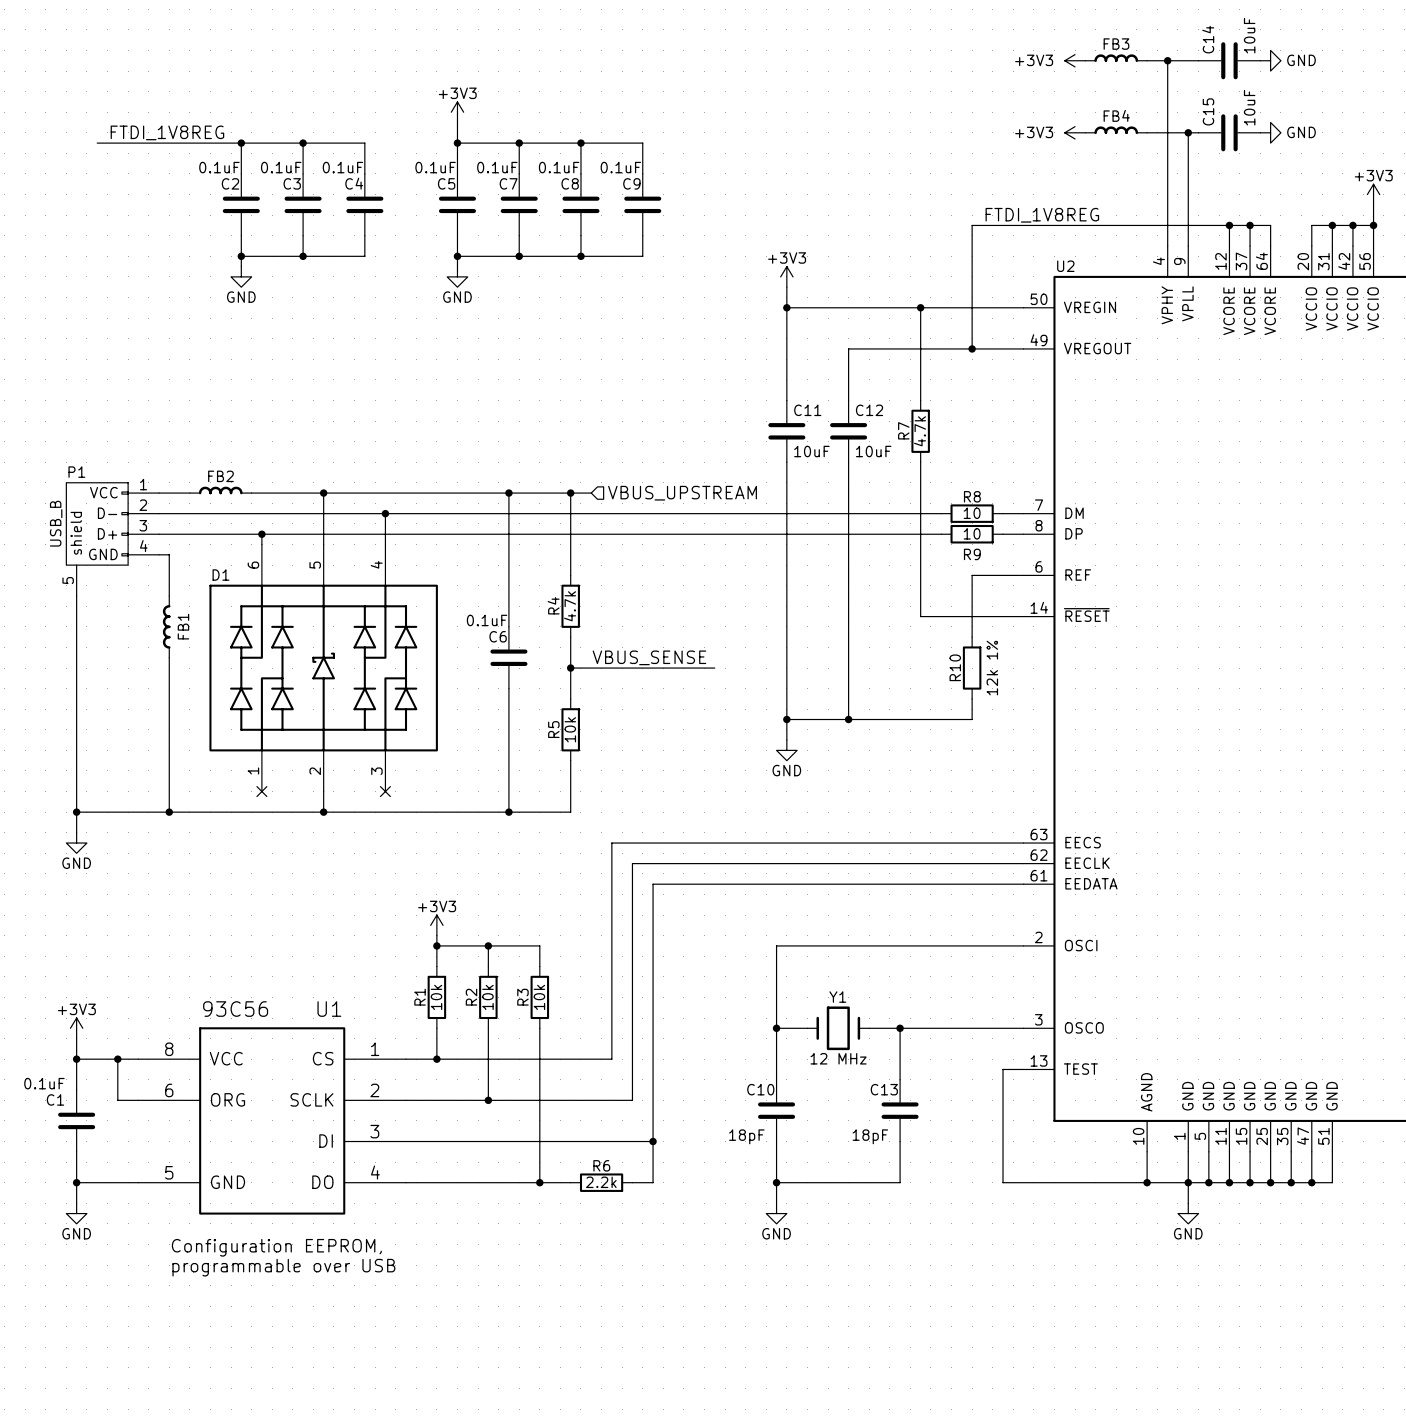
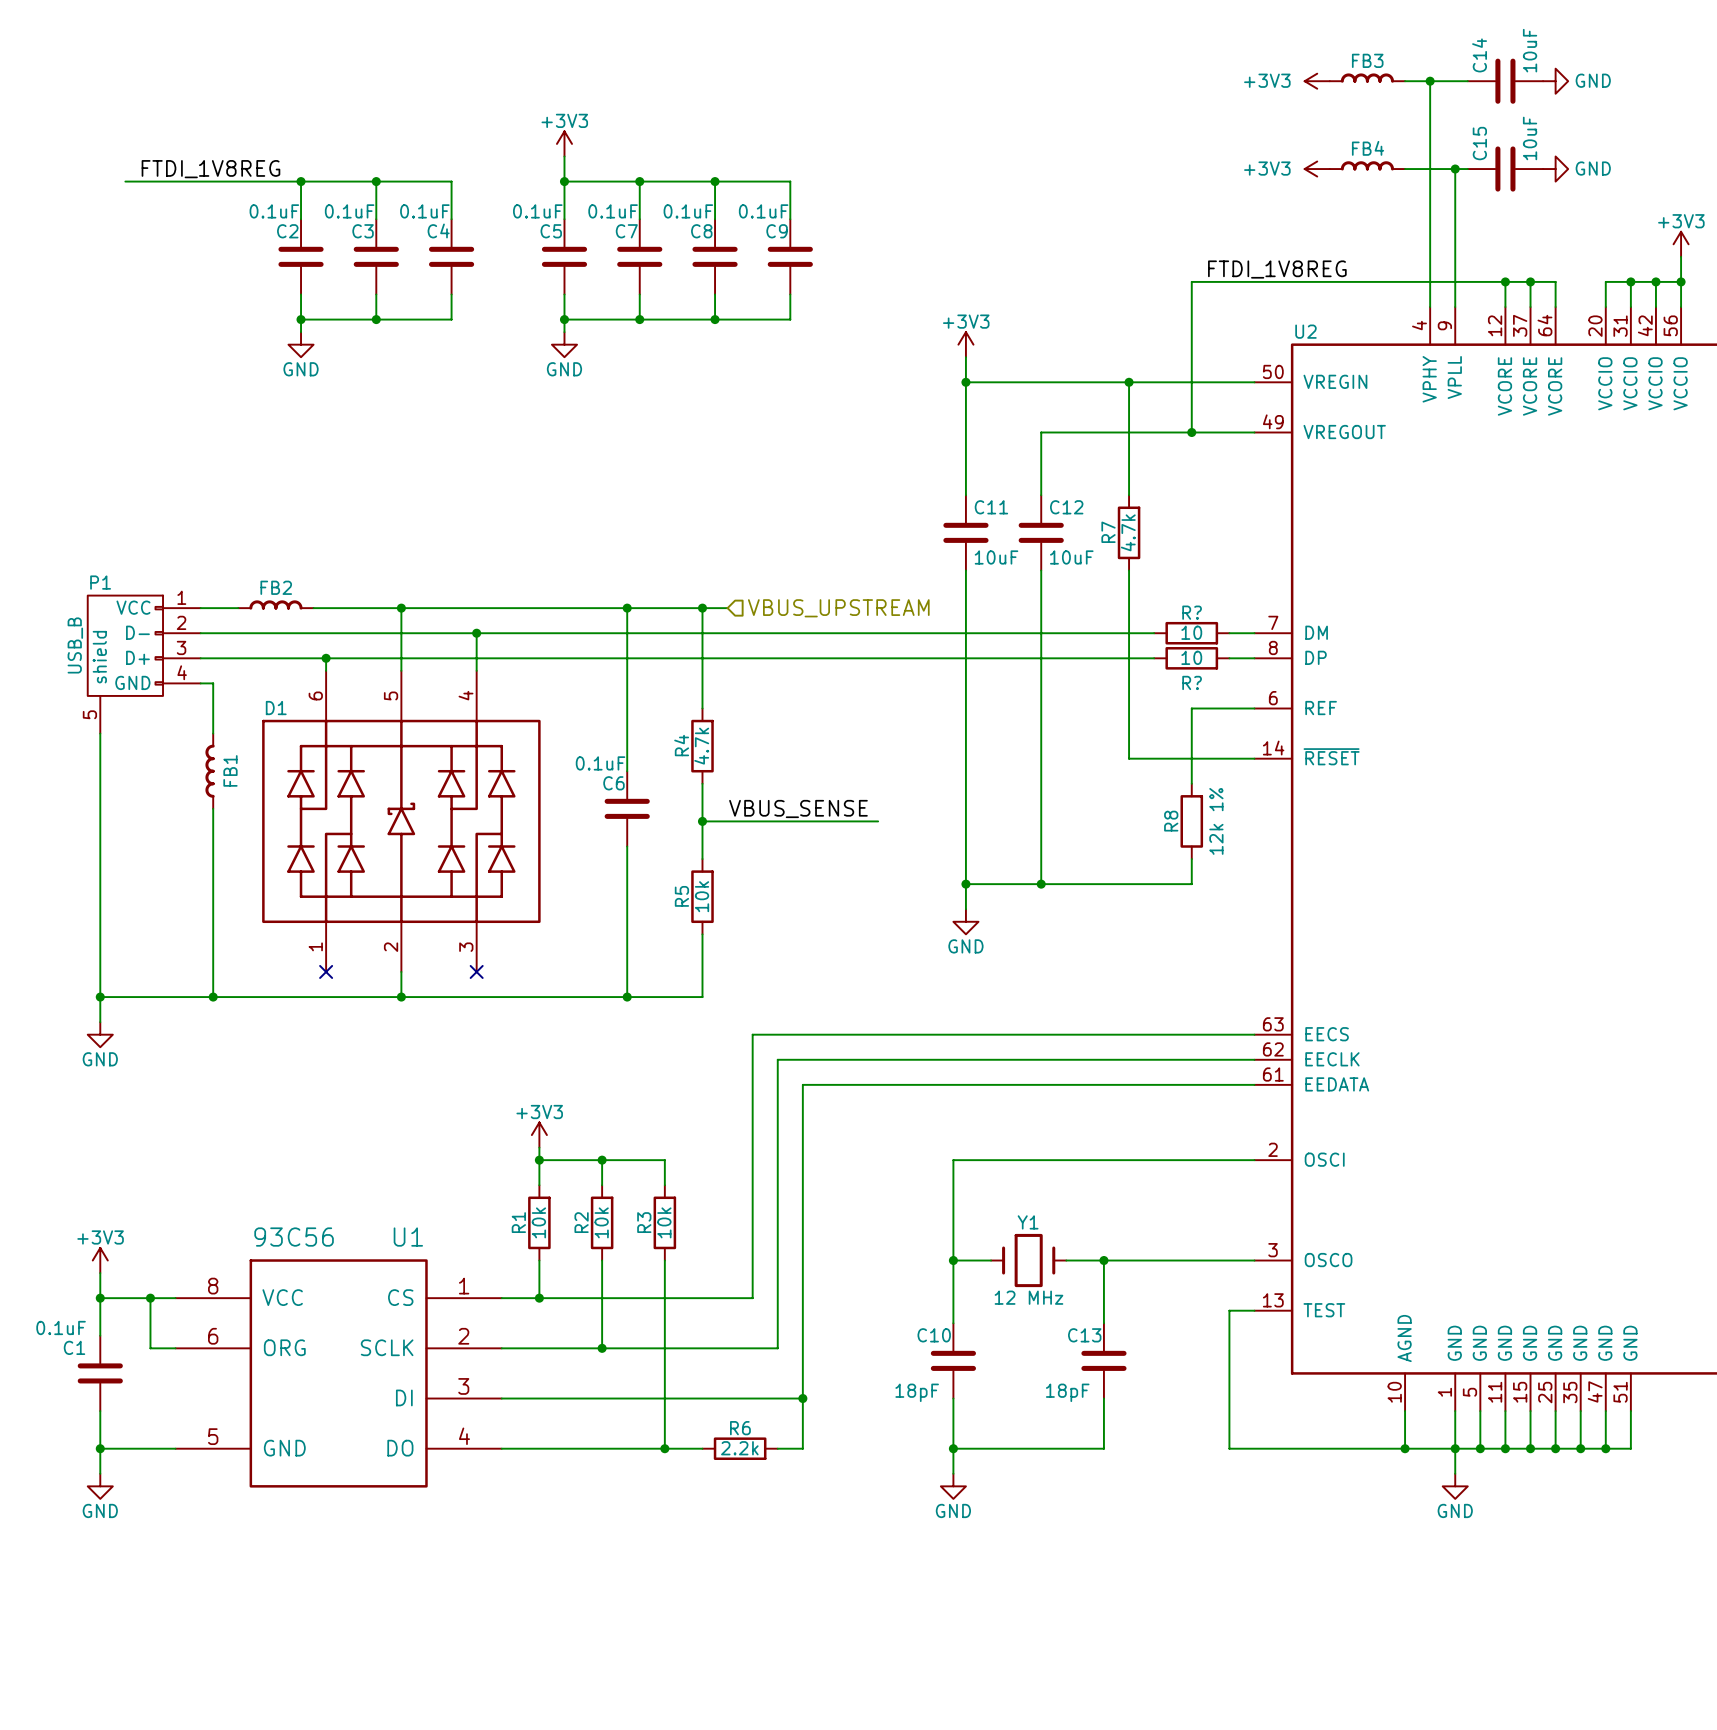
R8 name: R8 (972, 496) -> R? (1192, 612)
R9 name: R9 (972, 554) -> R? (1192, 682)
R10 name: R10 (955, 667) -> R8 (1171, 821)
text: Configuration EEPROM, (276, 1247) -> none
text: programmable over USB (283, 1267) -> none

